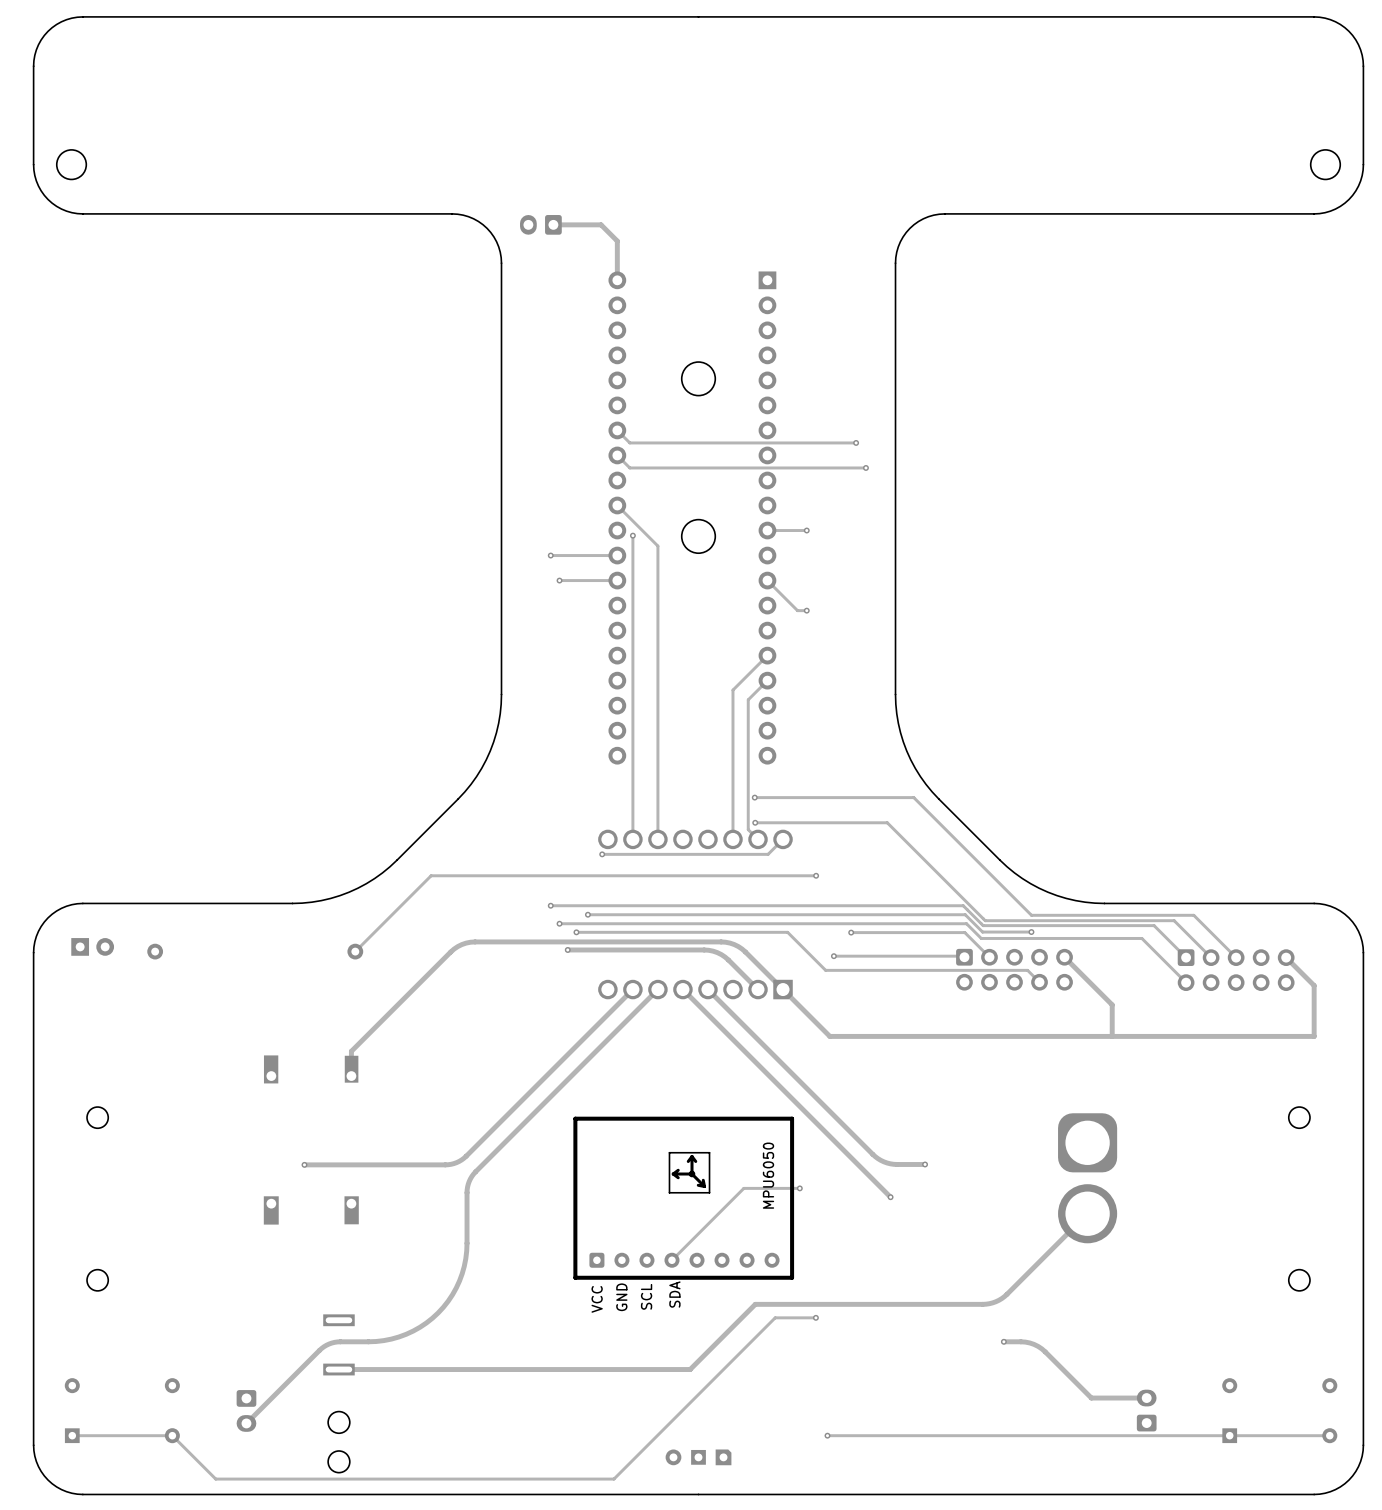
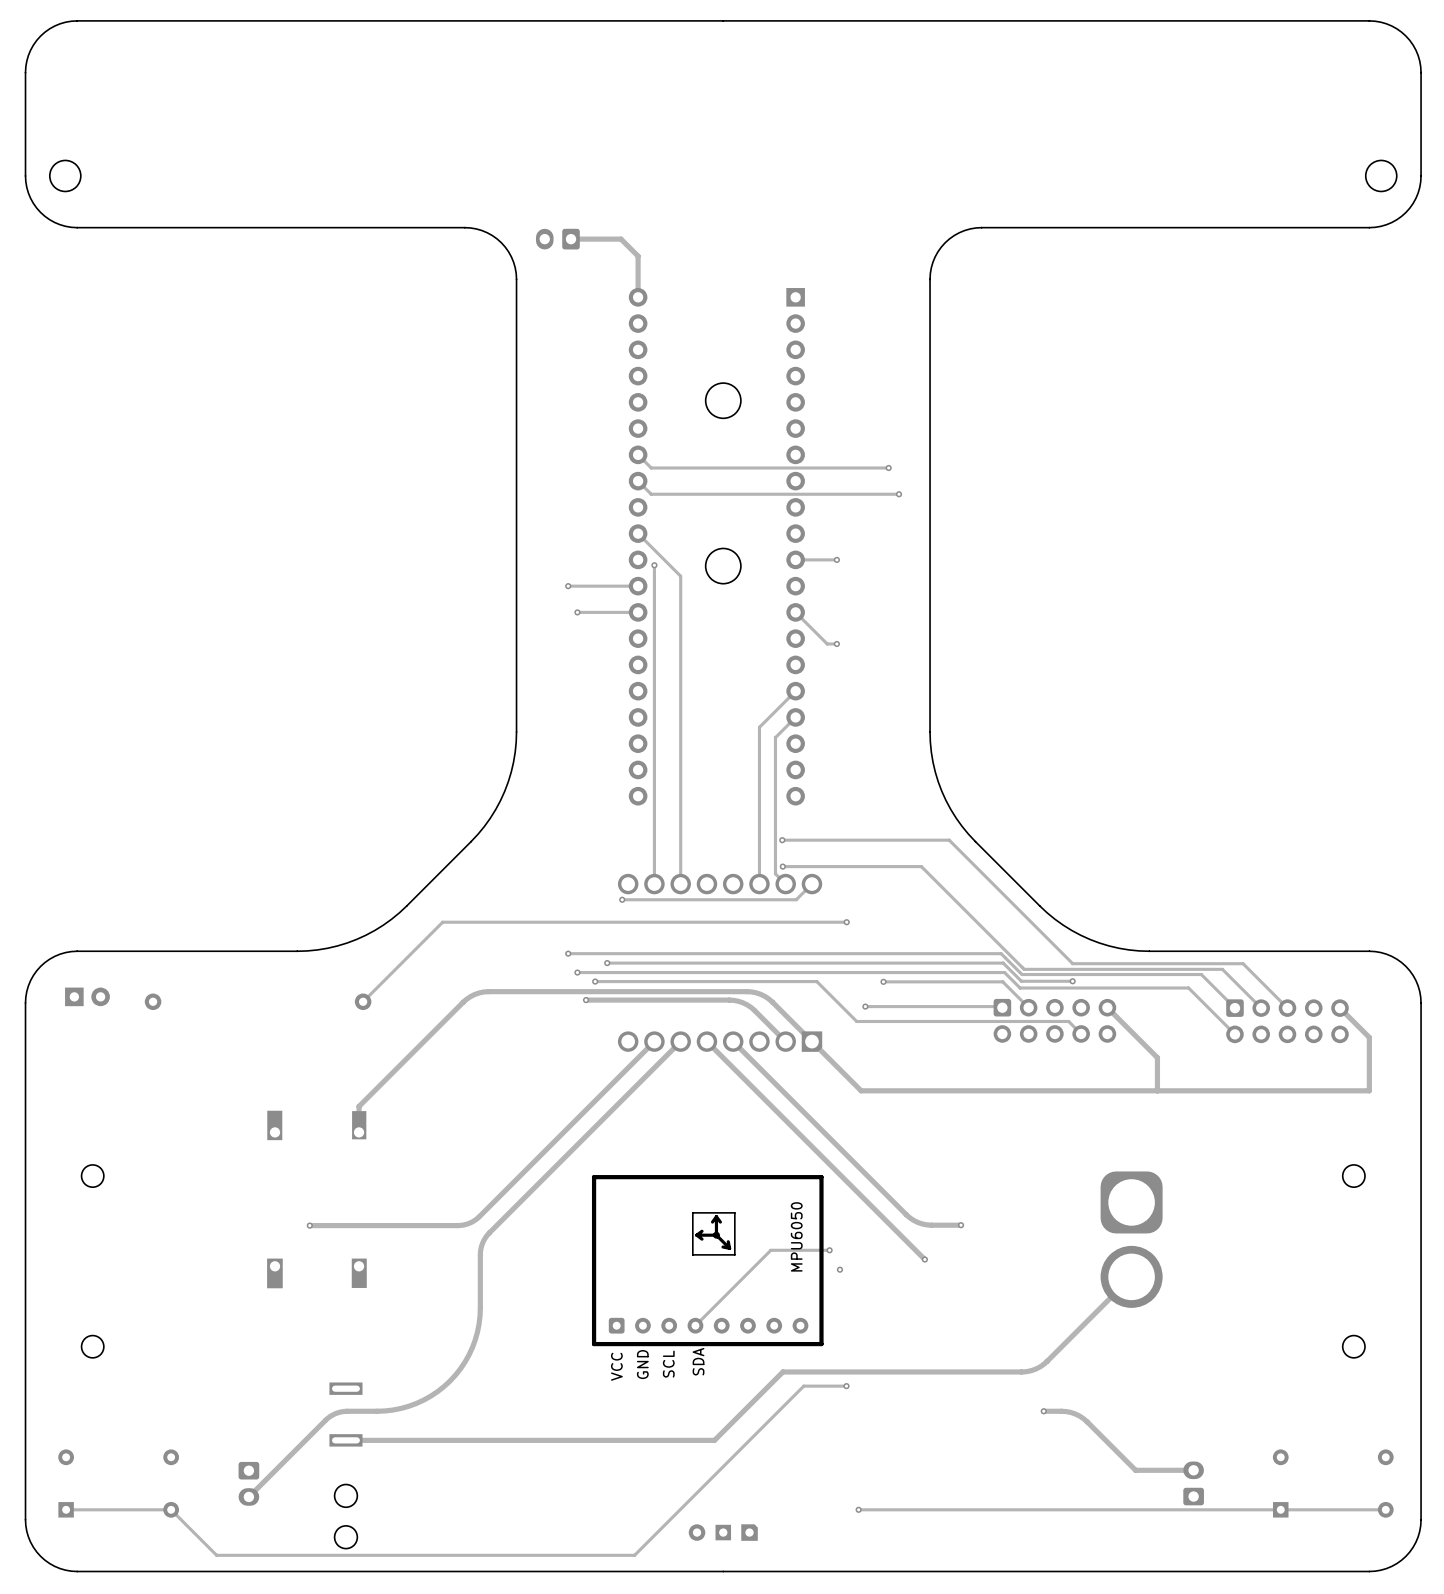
via: none -> (839, 1269)

